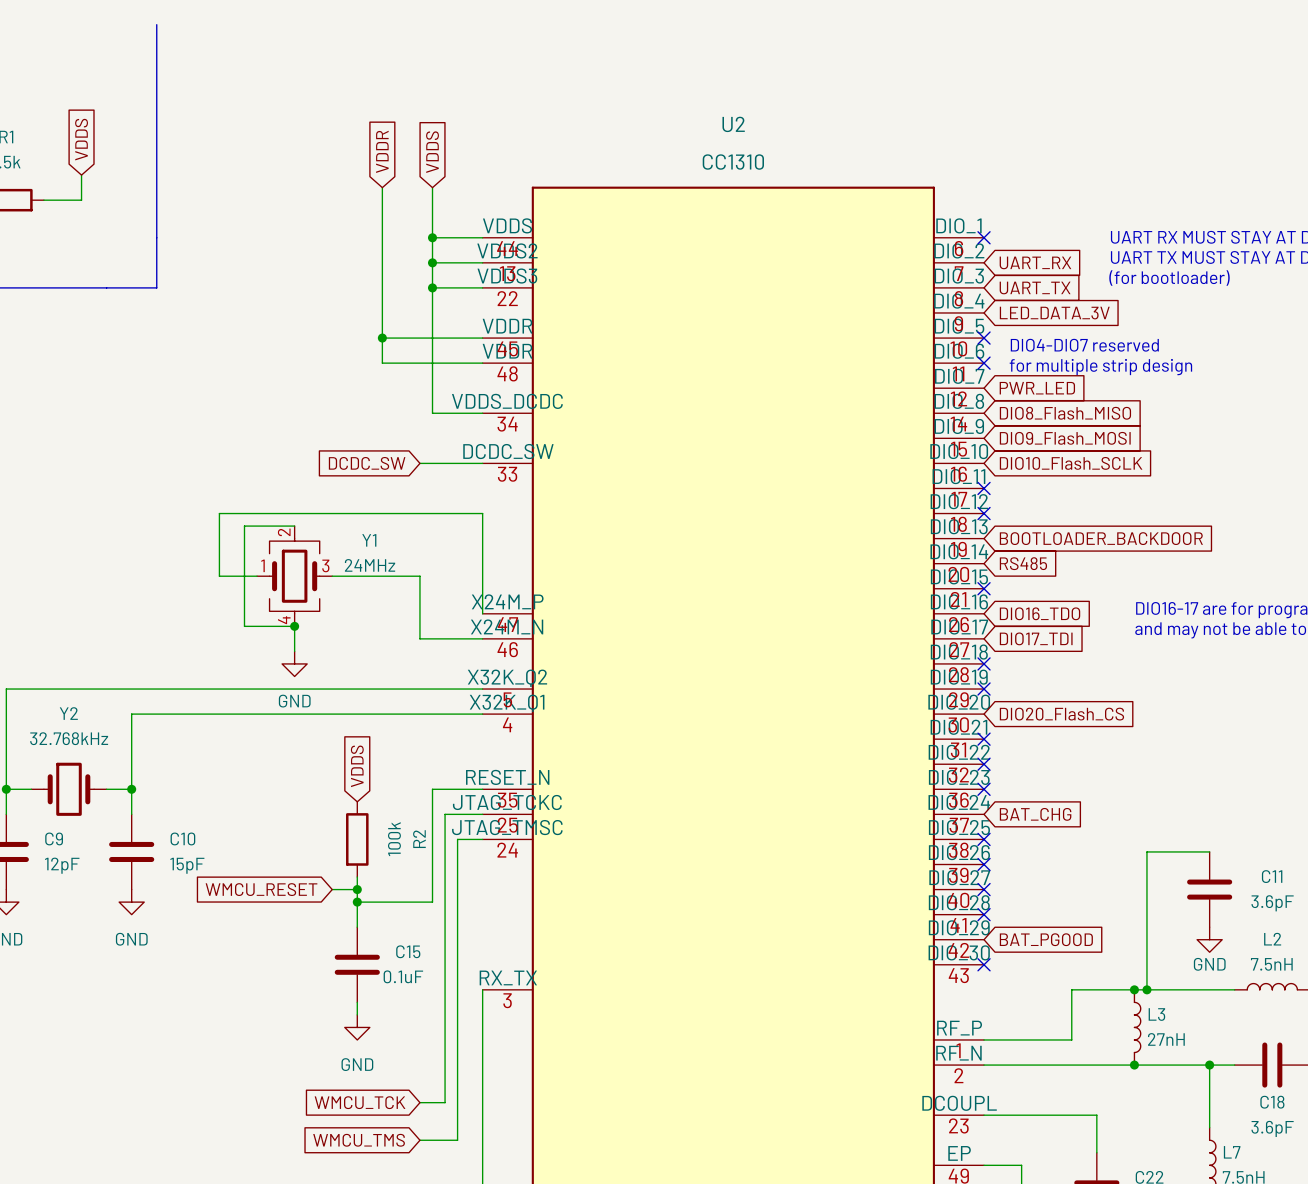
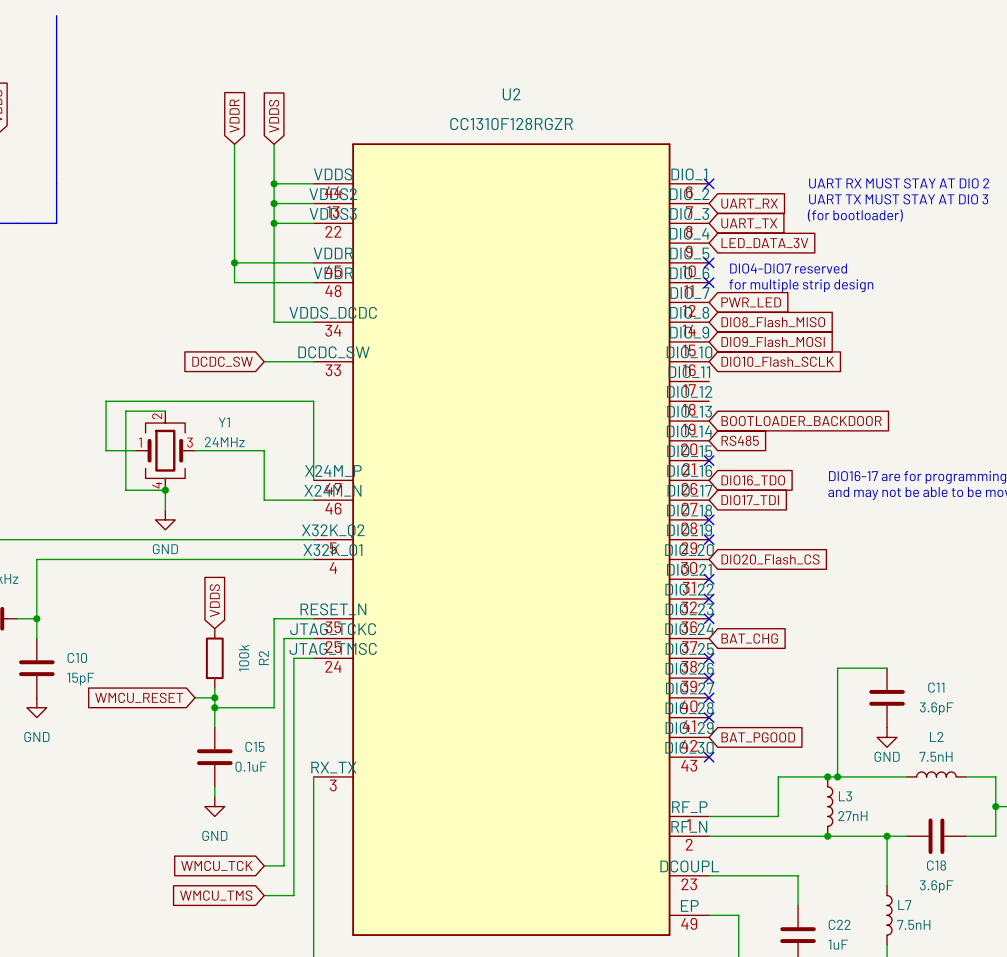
U2 value: CC1310 (733, 162) -> CC1310F128RGZR (511, 124)
no-connect mark: (984, 488) -> none
no-connect mark: (984, 513) -> none

